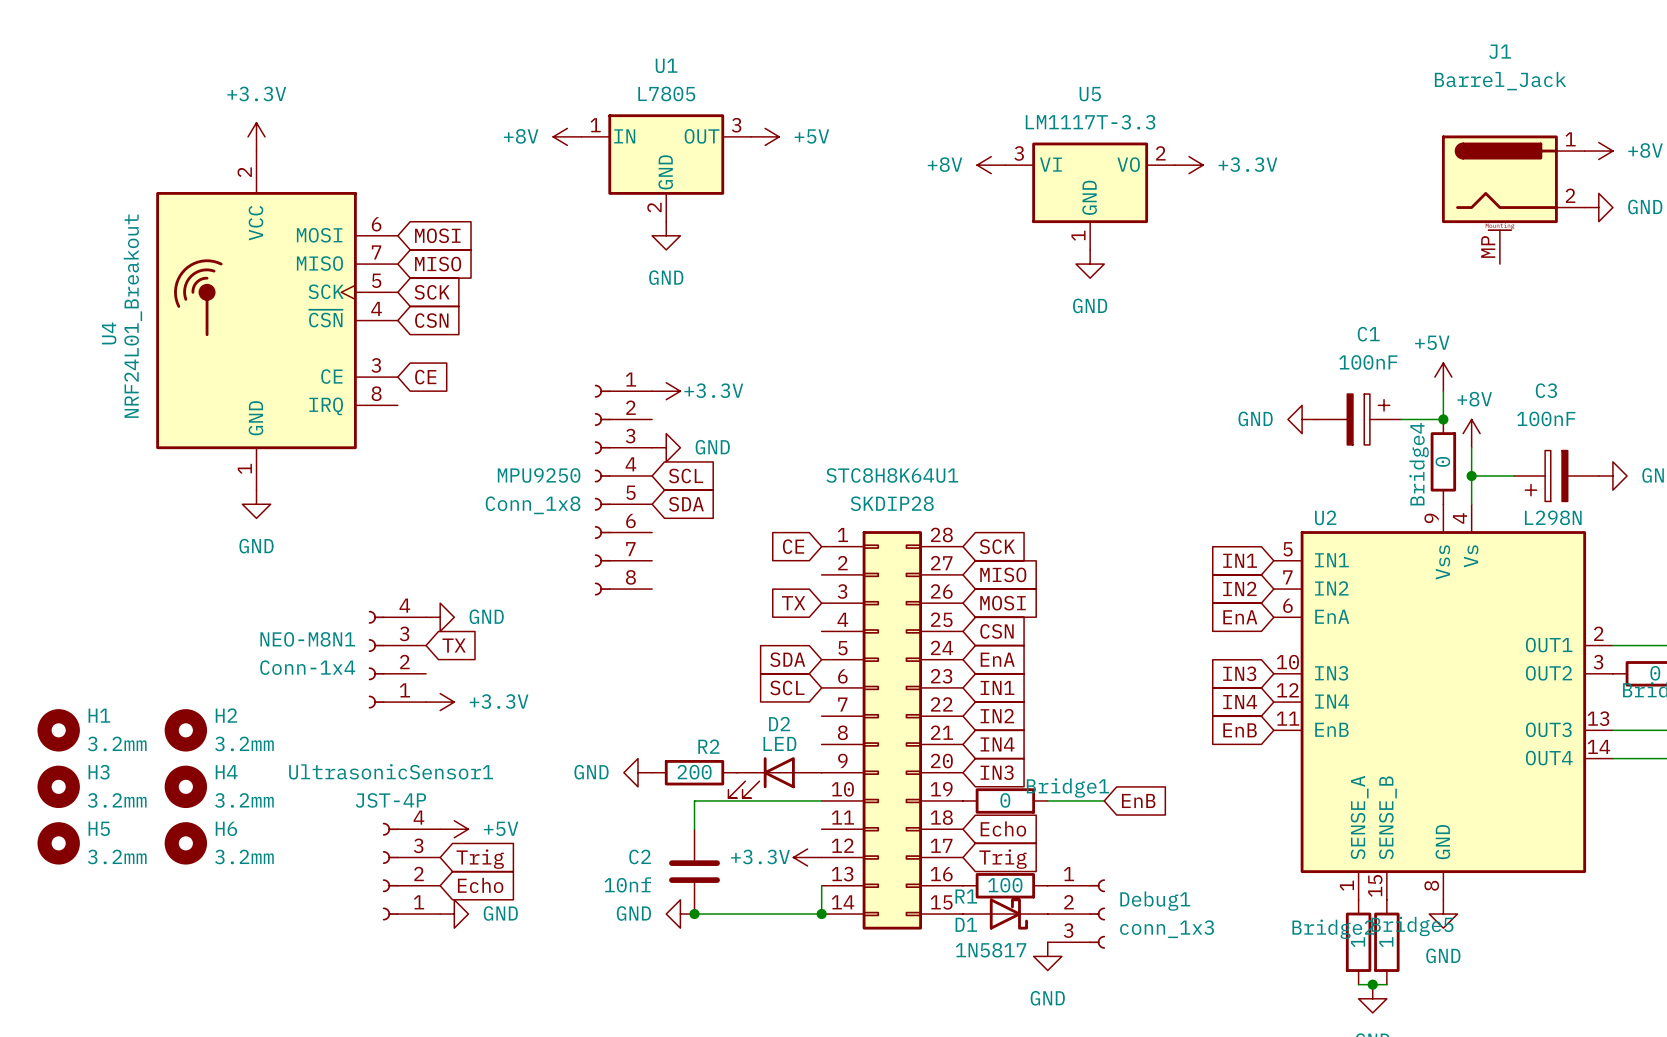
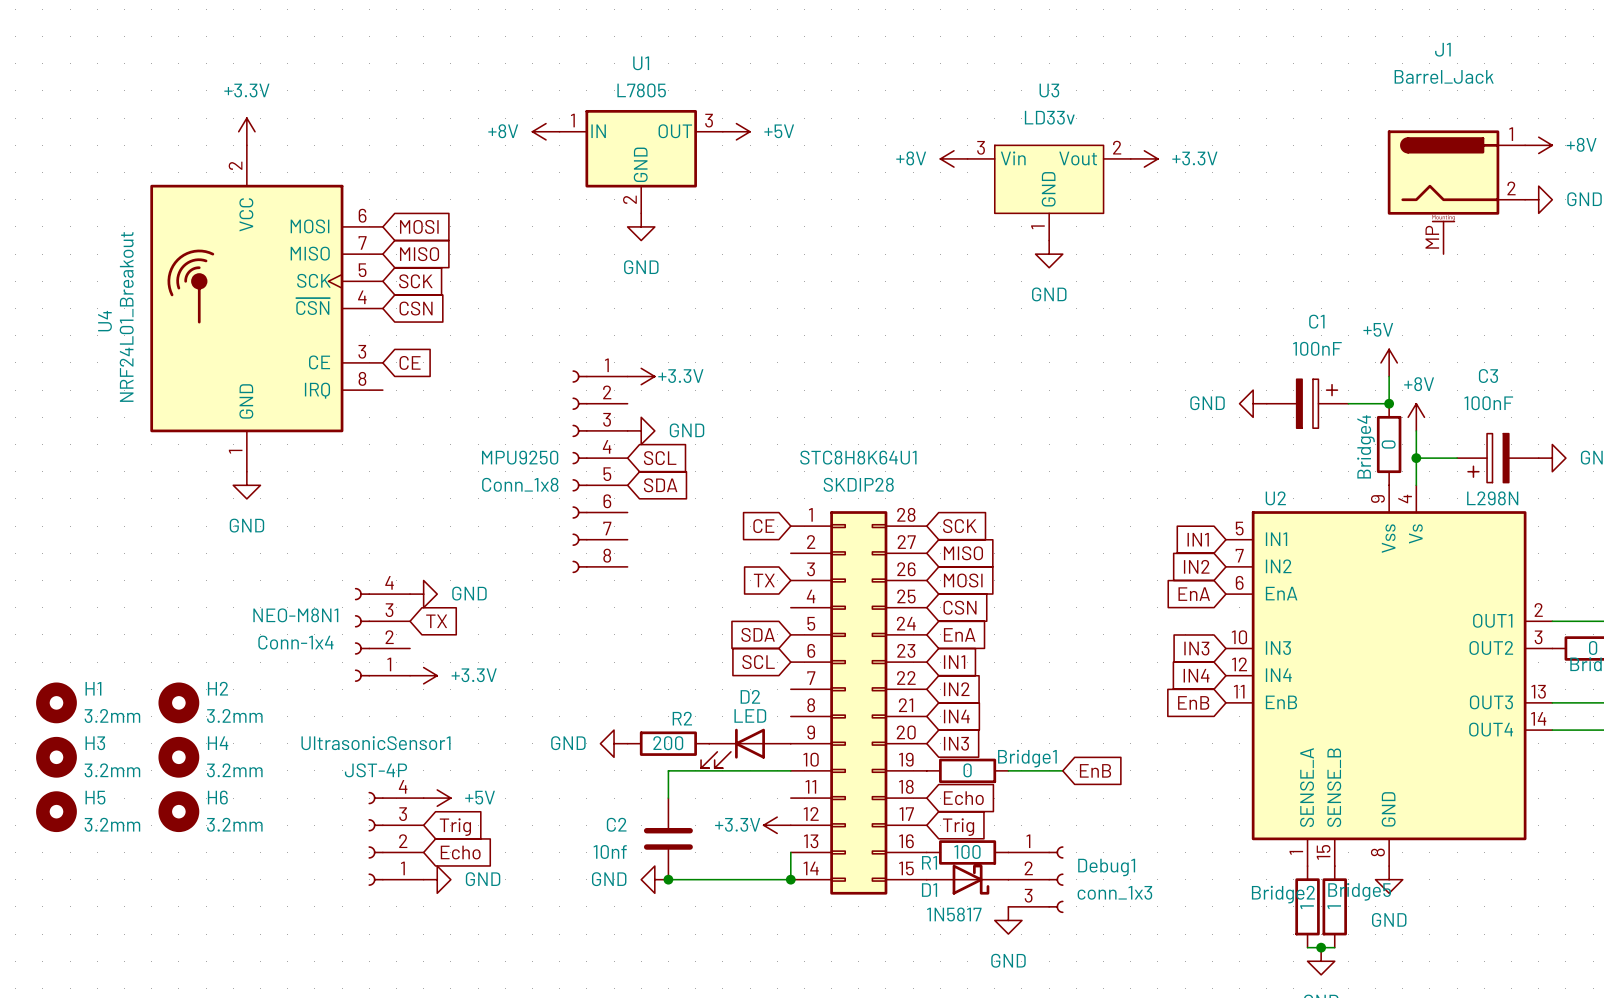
U5: LM1117T-3.3 (1090, 196) -> none
U3: none -> LD33v (1049, 192)

